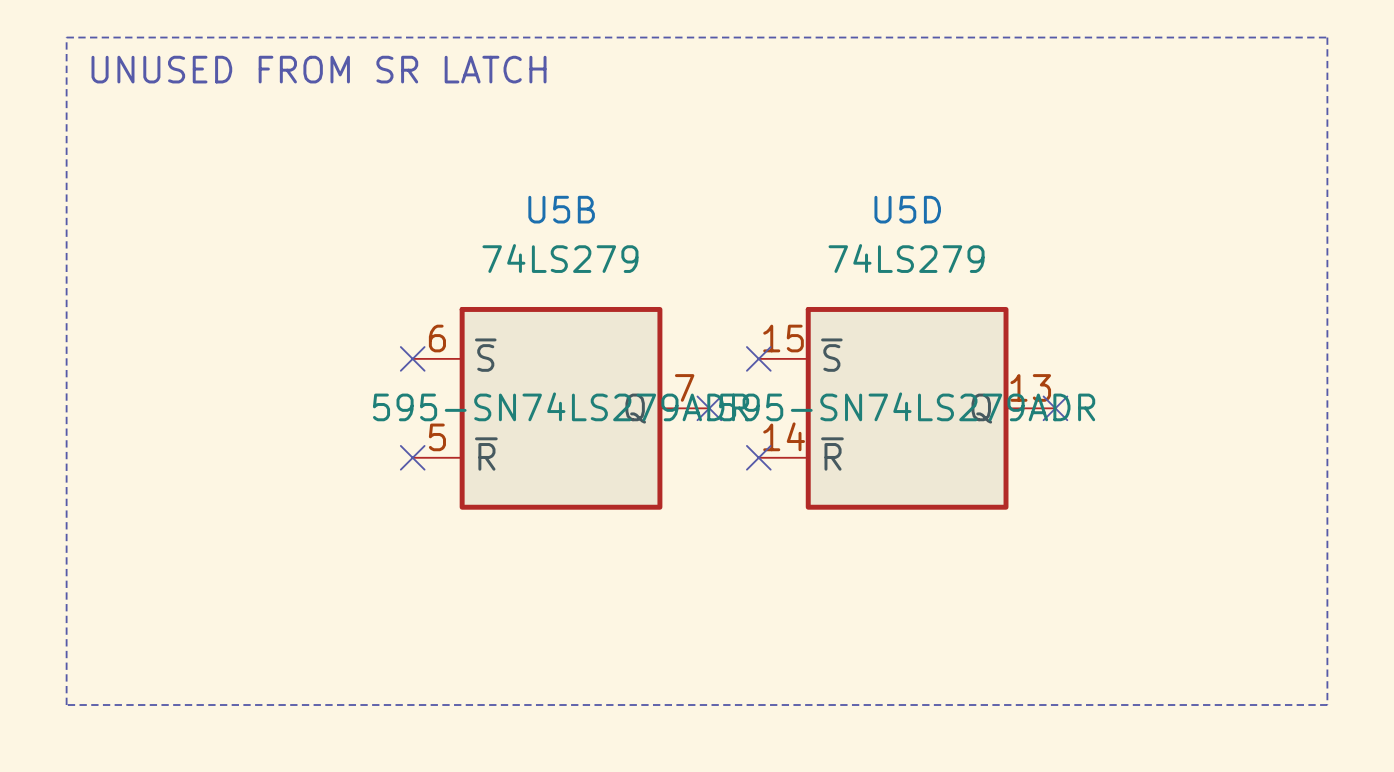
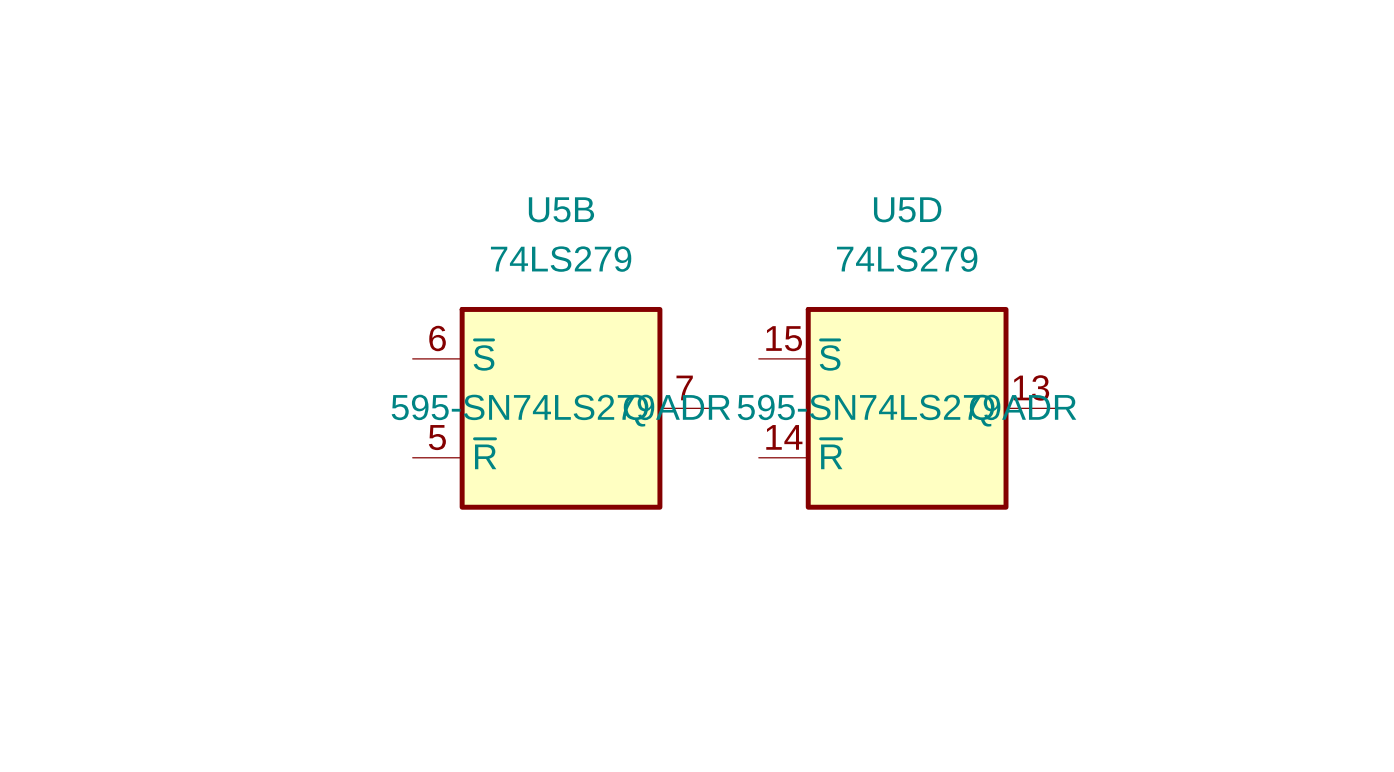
line: (66, 37) (1327, 37) (1327, 705) (66, 705) (66, 37) -> none
text: UNUSED FROM SR LATCH (319, 69) -> none
no-connect mark: (412, 358) -> none
no-connect mark: (758, 358) -> none
no-connect mark: (709, 408) -> none
no-connect mark: (1055, 408) -> none
no-connect mark: (412, 457) -> none
no-connect mark: (758, 457) -> none

